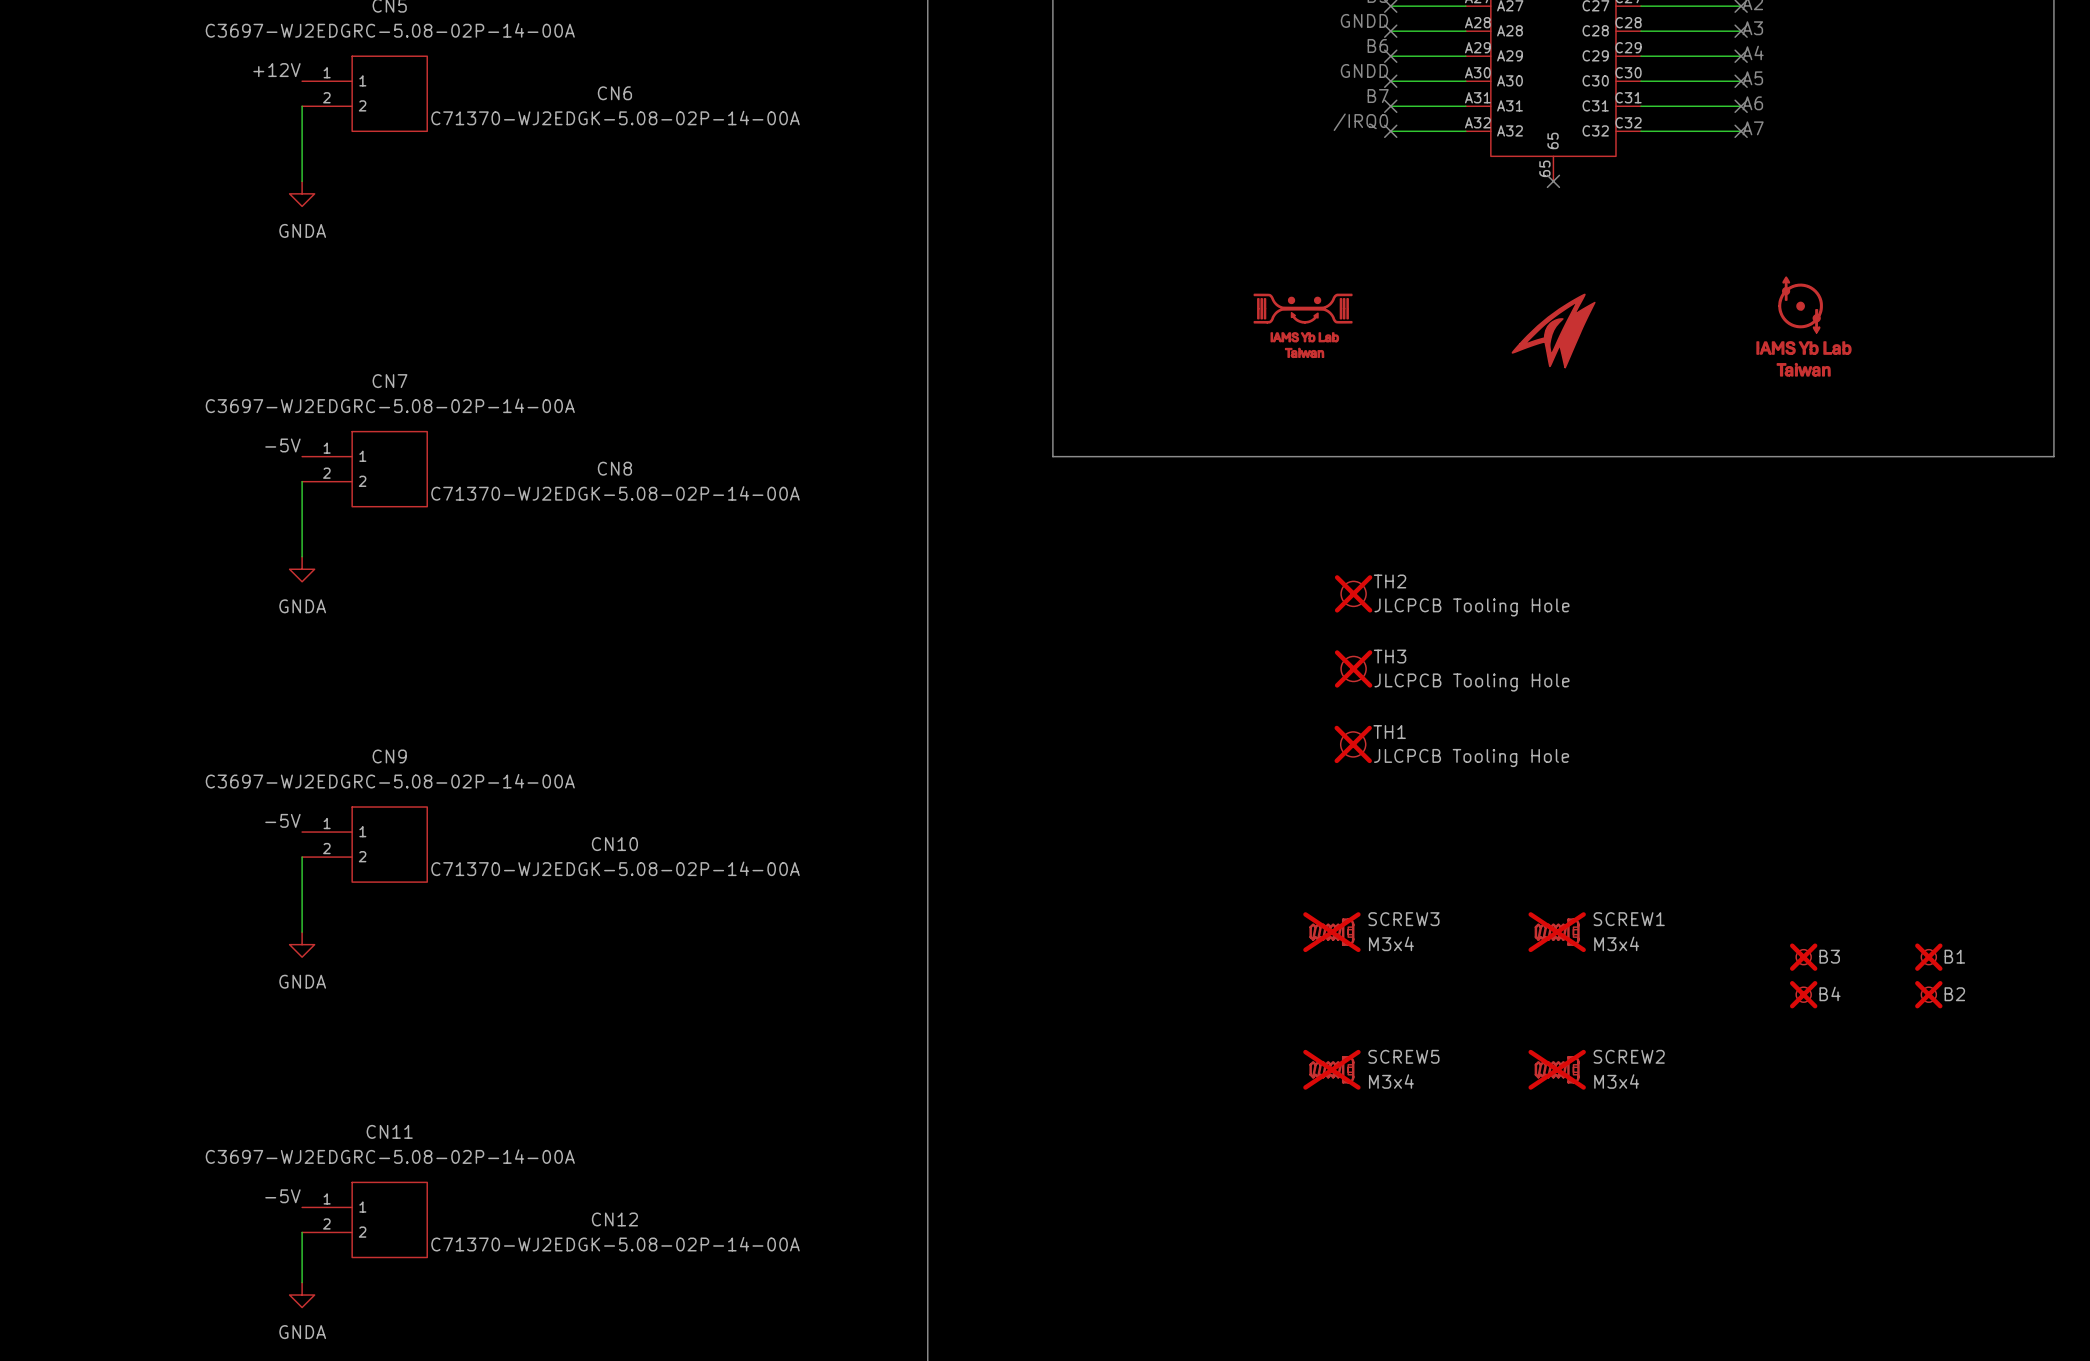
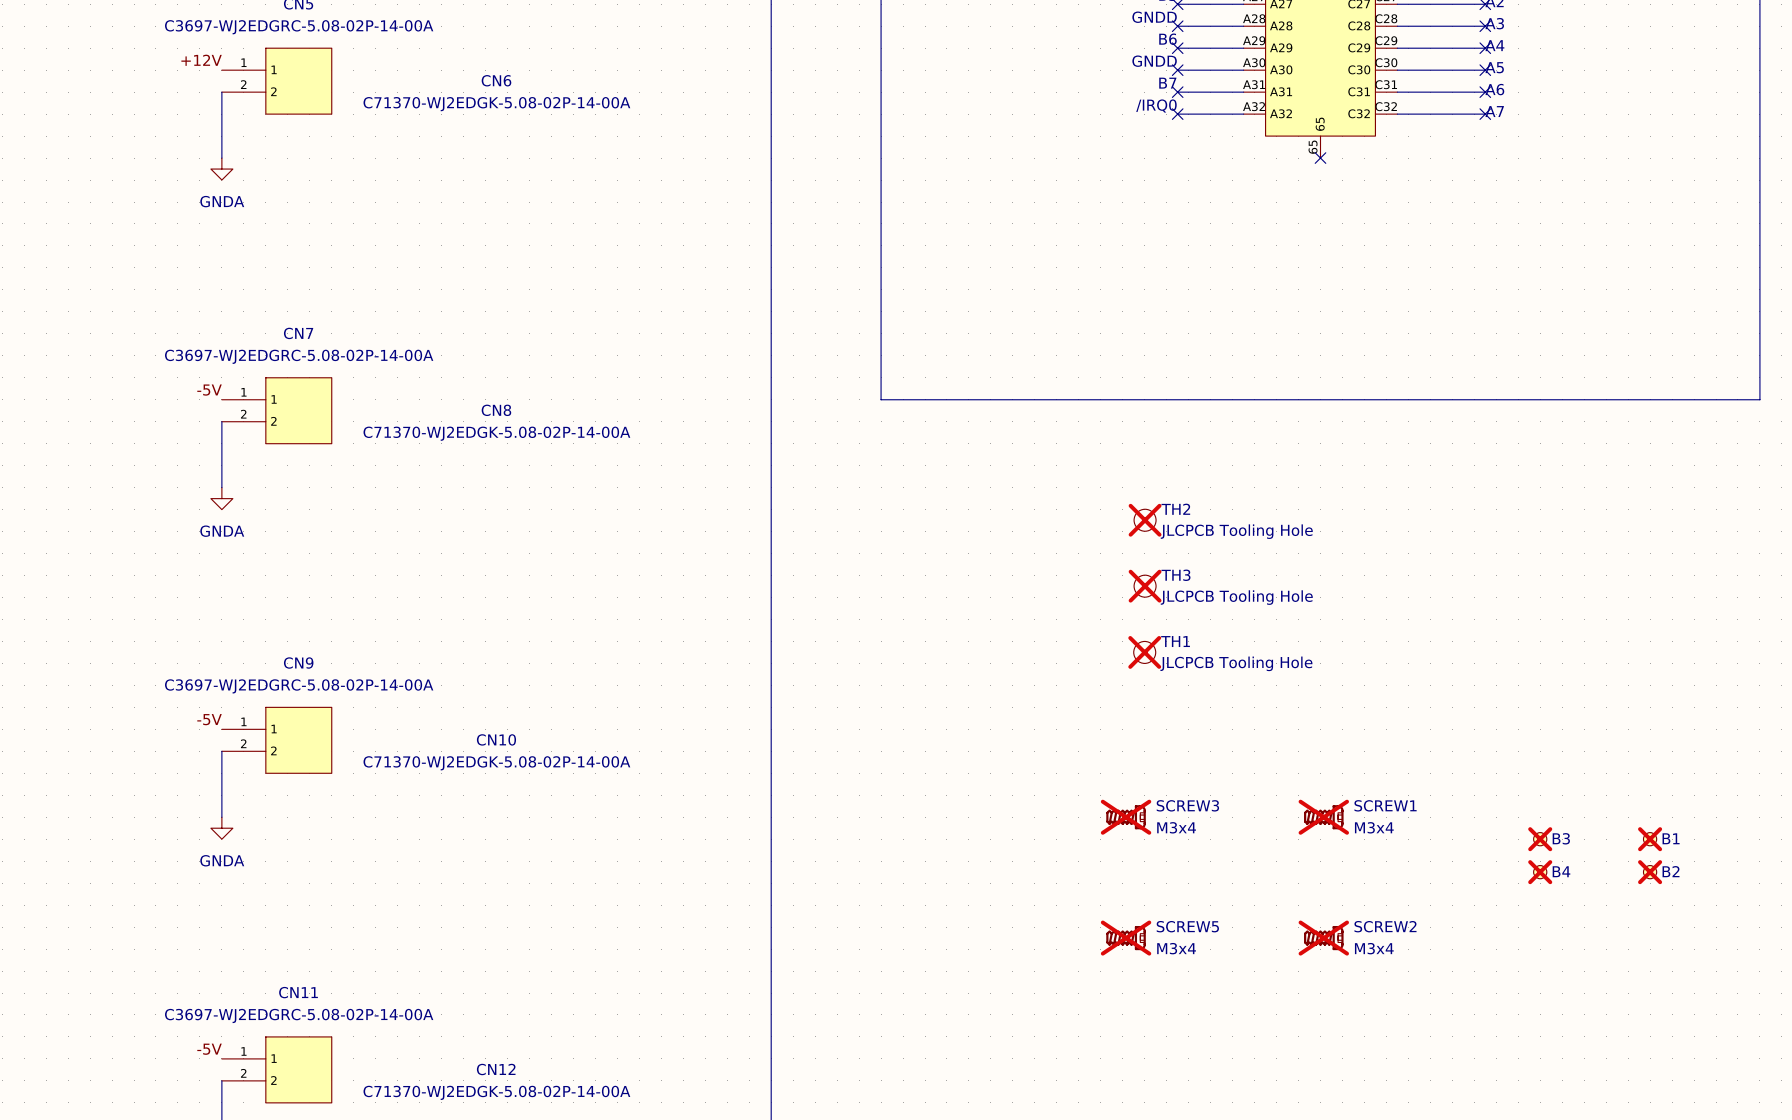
part: (1303, 325) -> none
part: (1803, 326) -> none
part: (1553, 331) -> none

